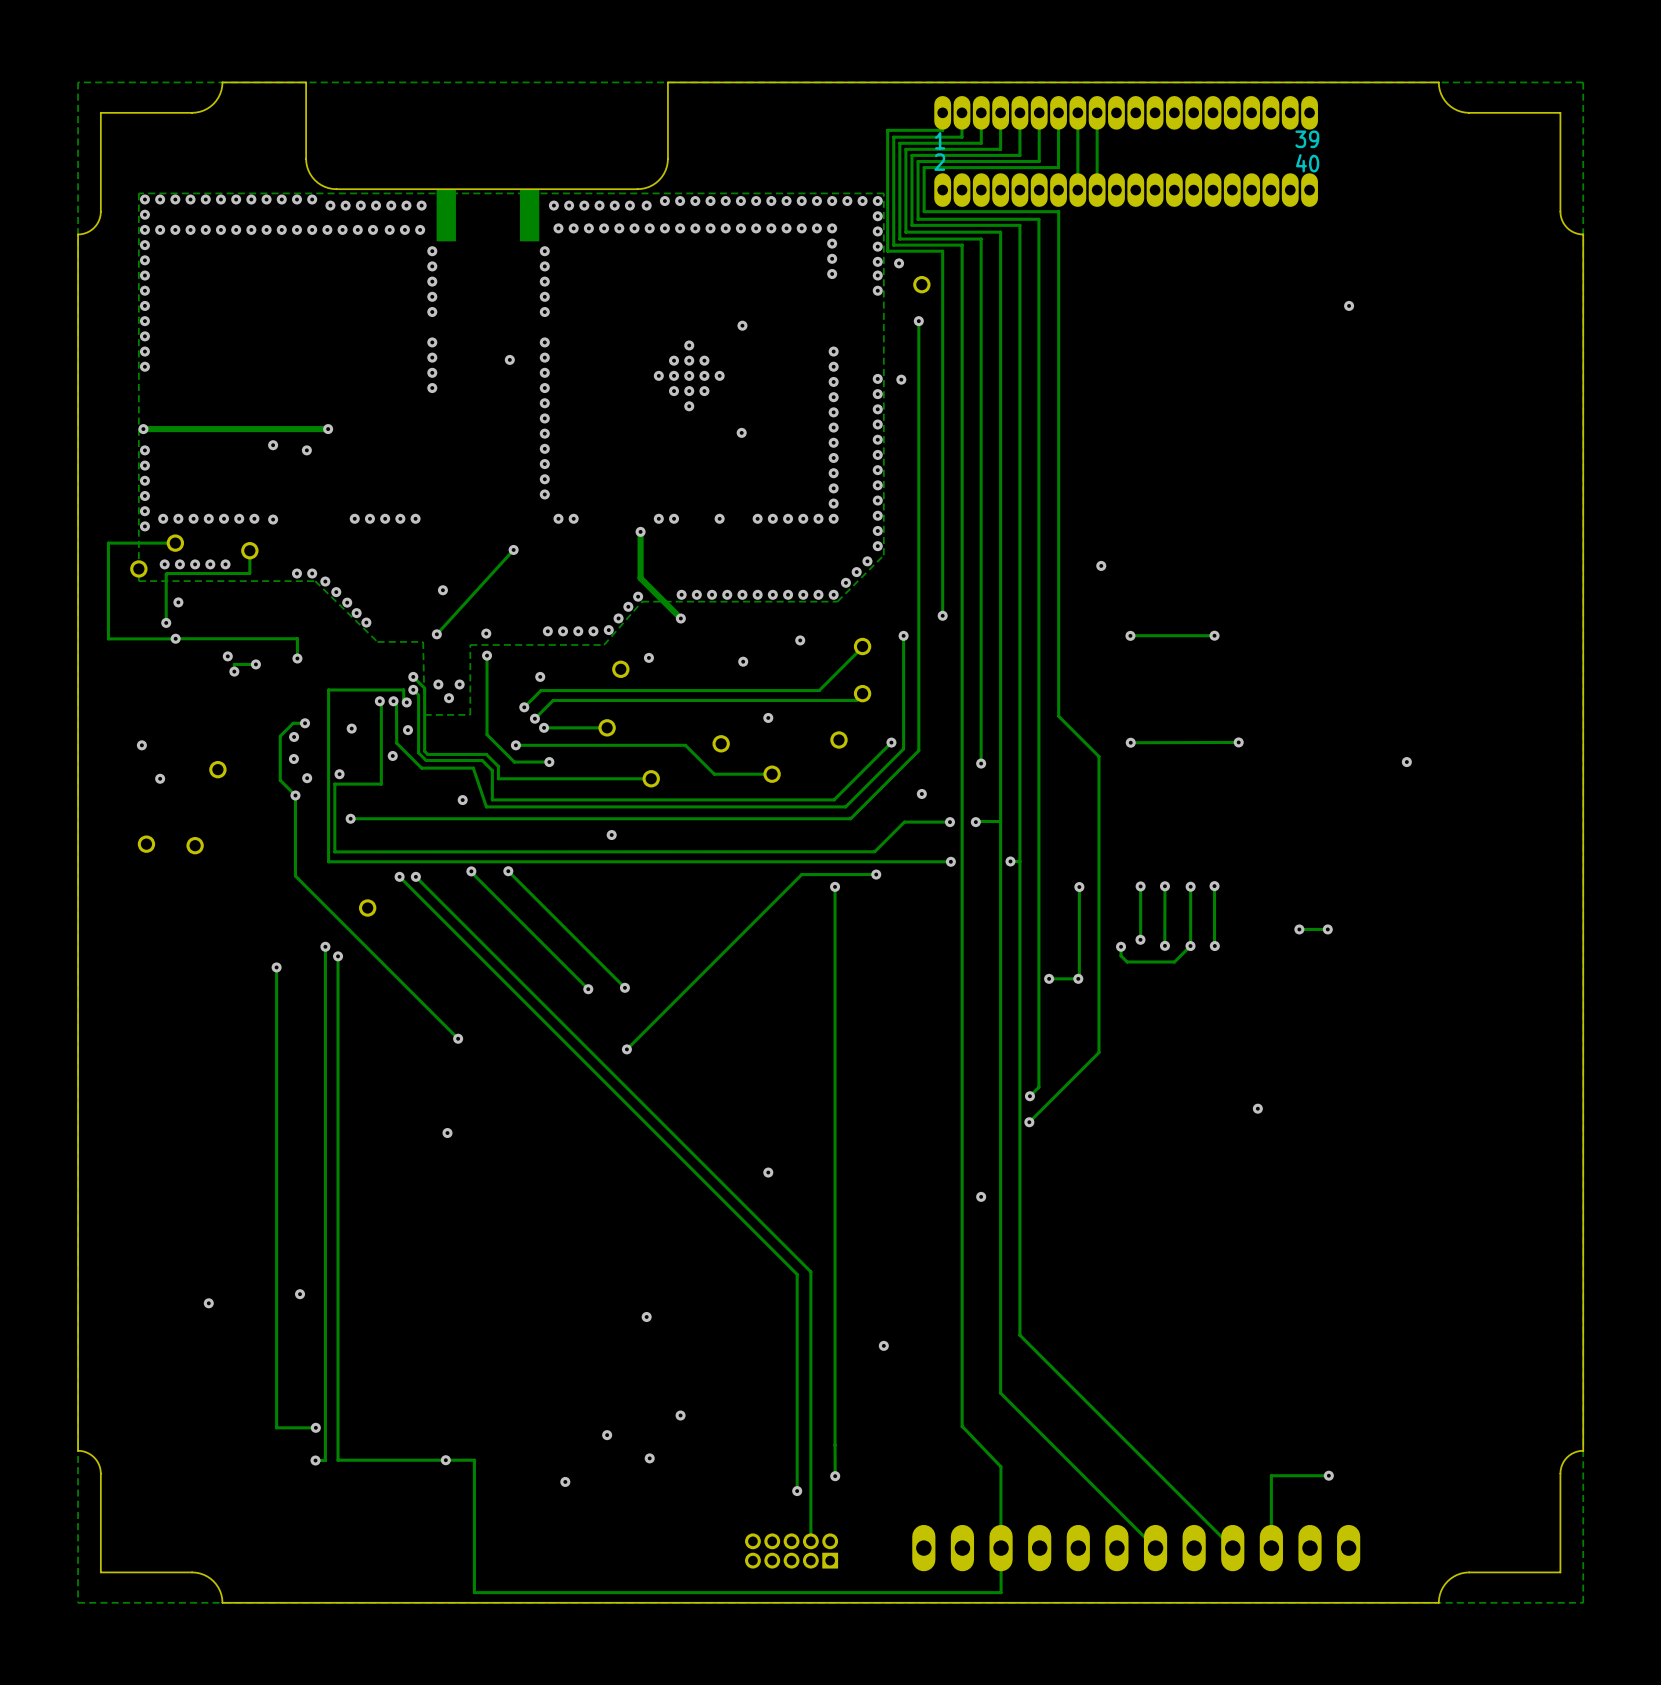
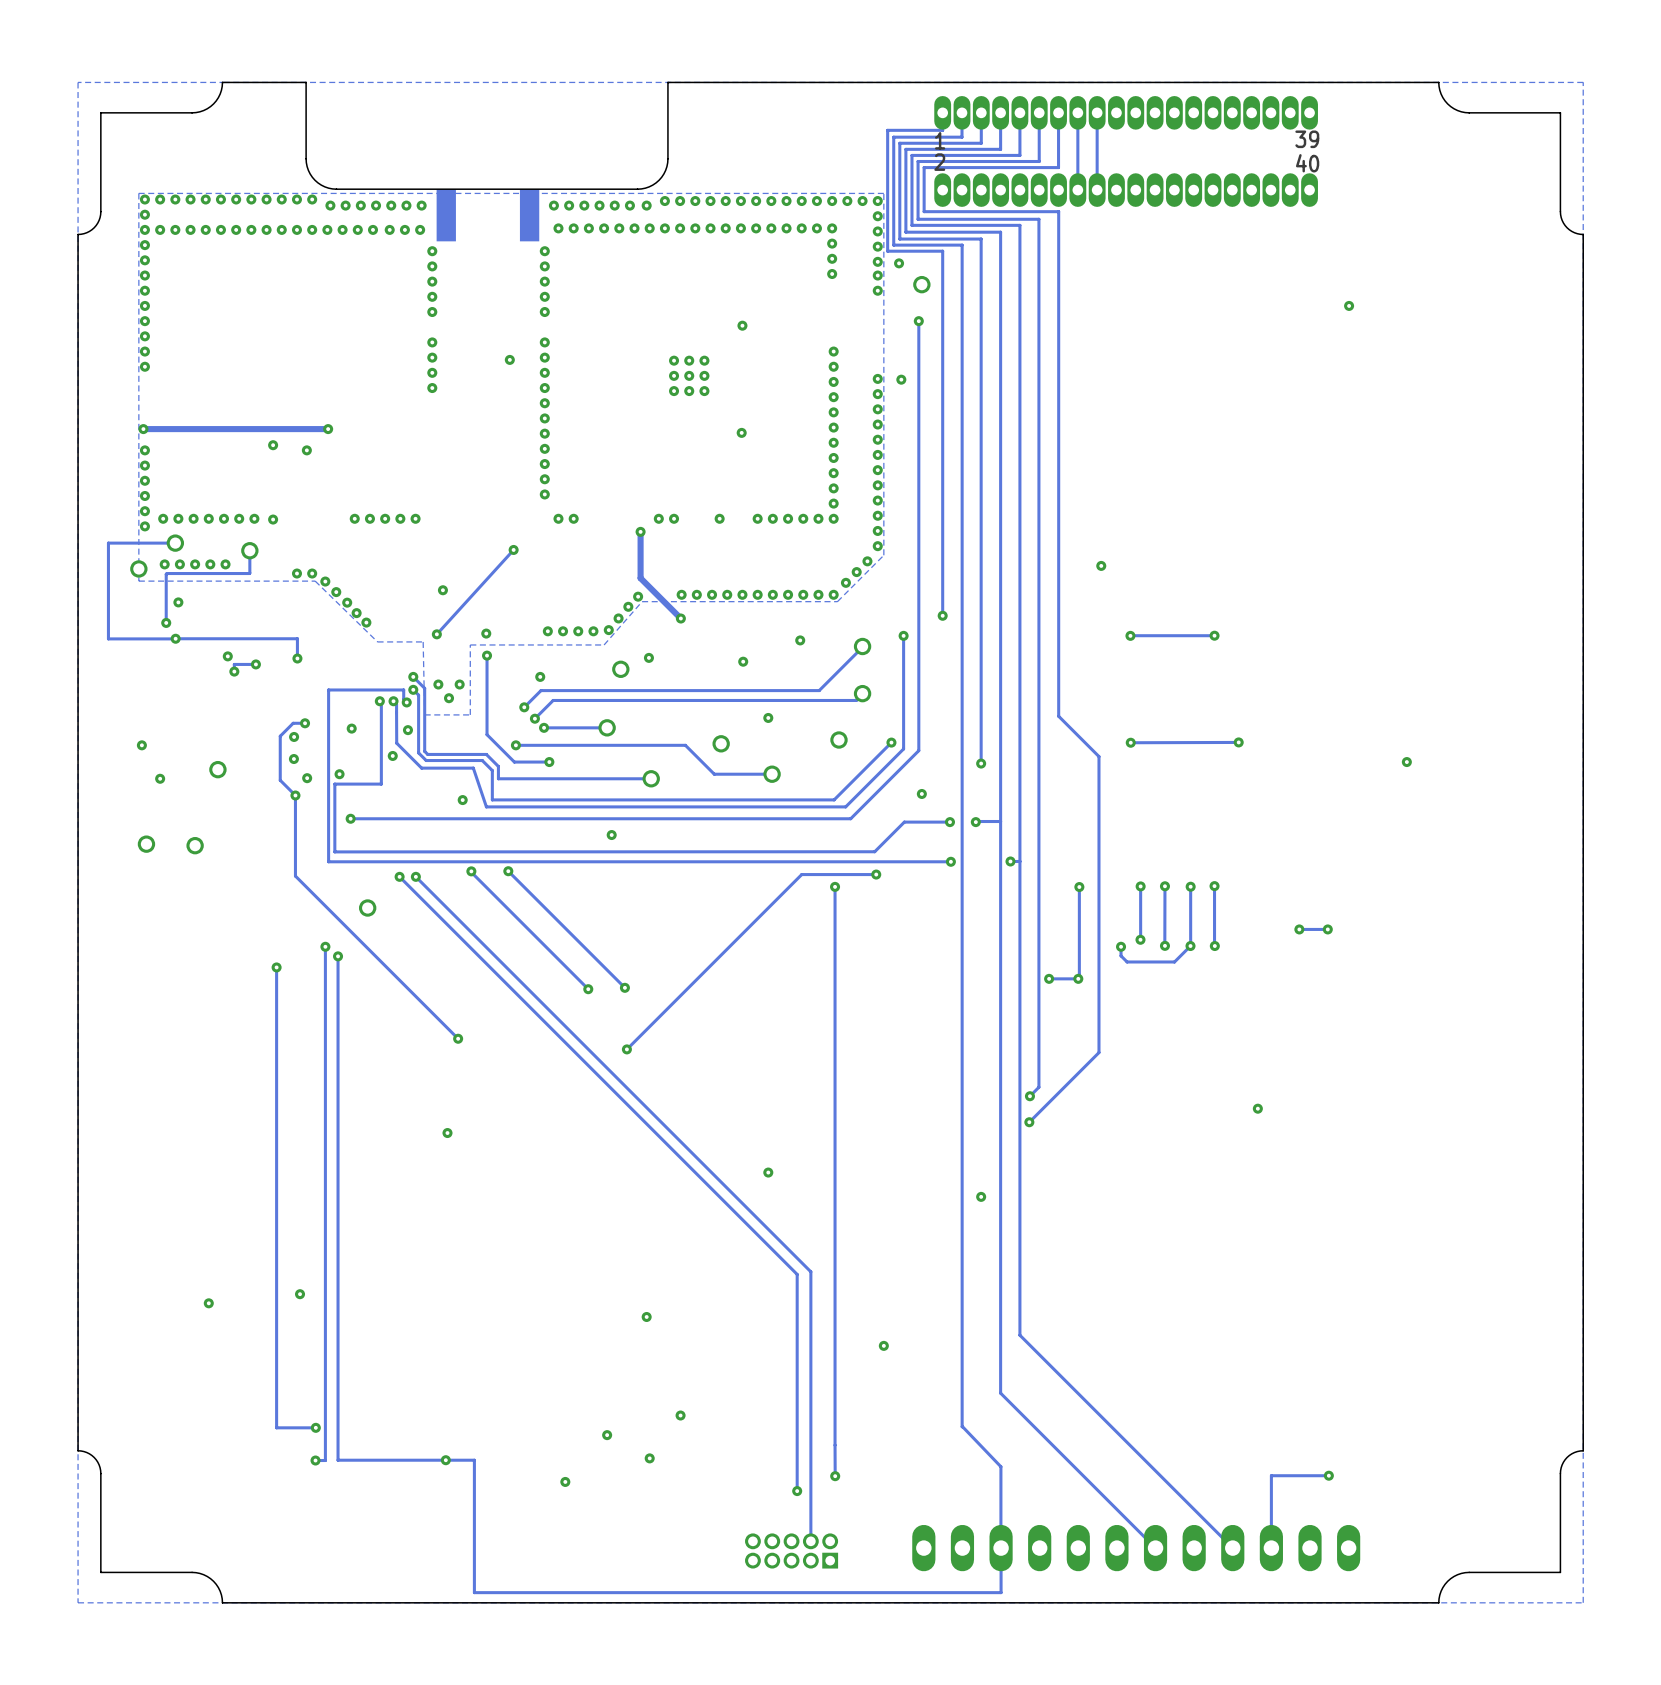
via: (689, 345) -> none
via: (658, 375) -> none
via: (719, 375) -> none
via: (689, 406) -> none

